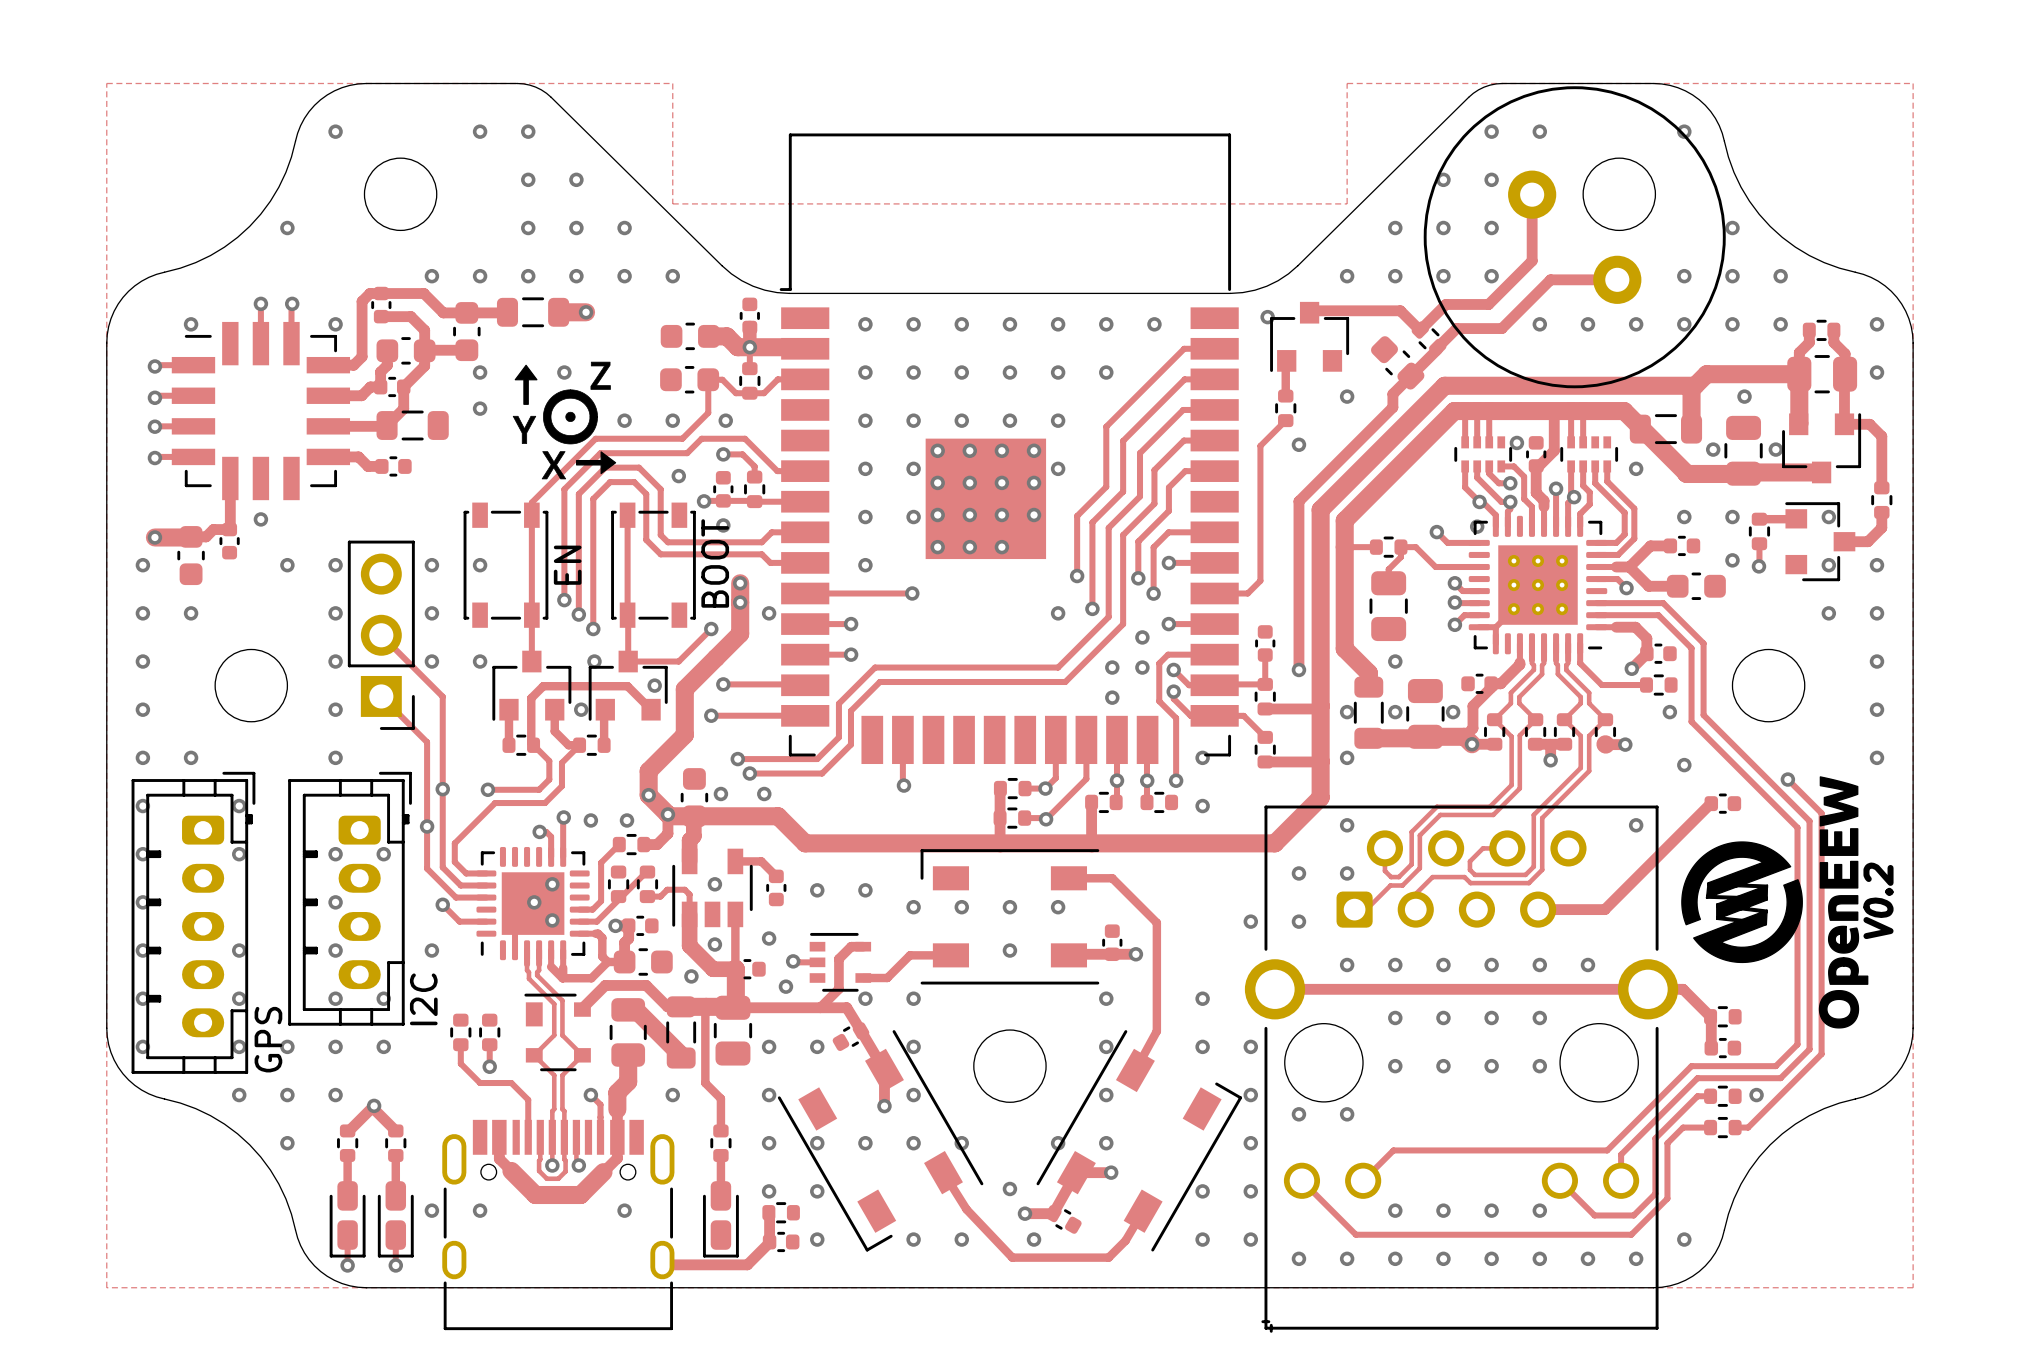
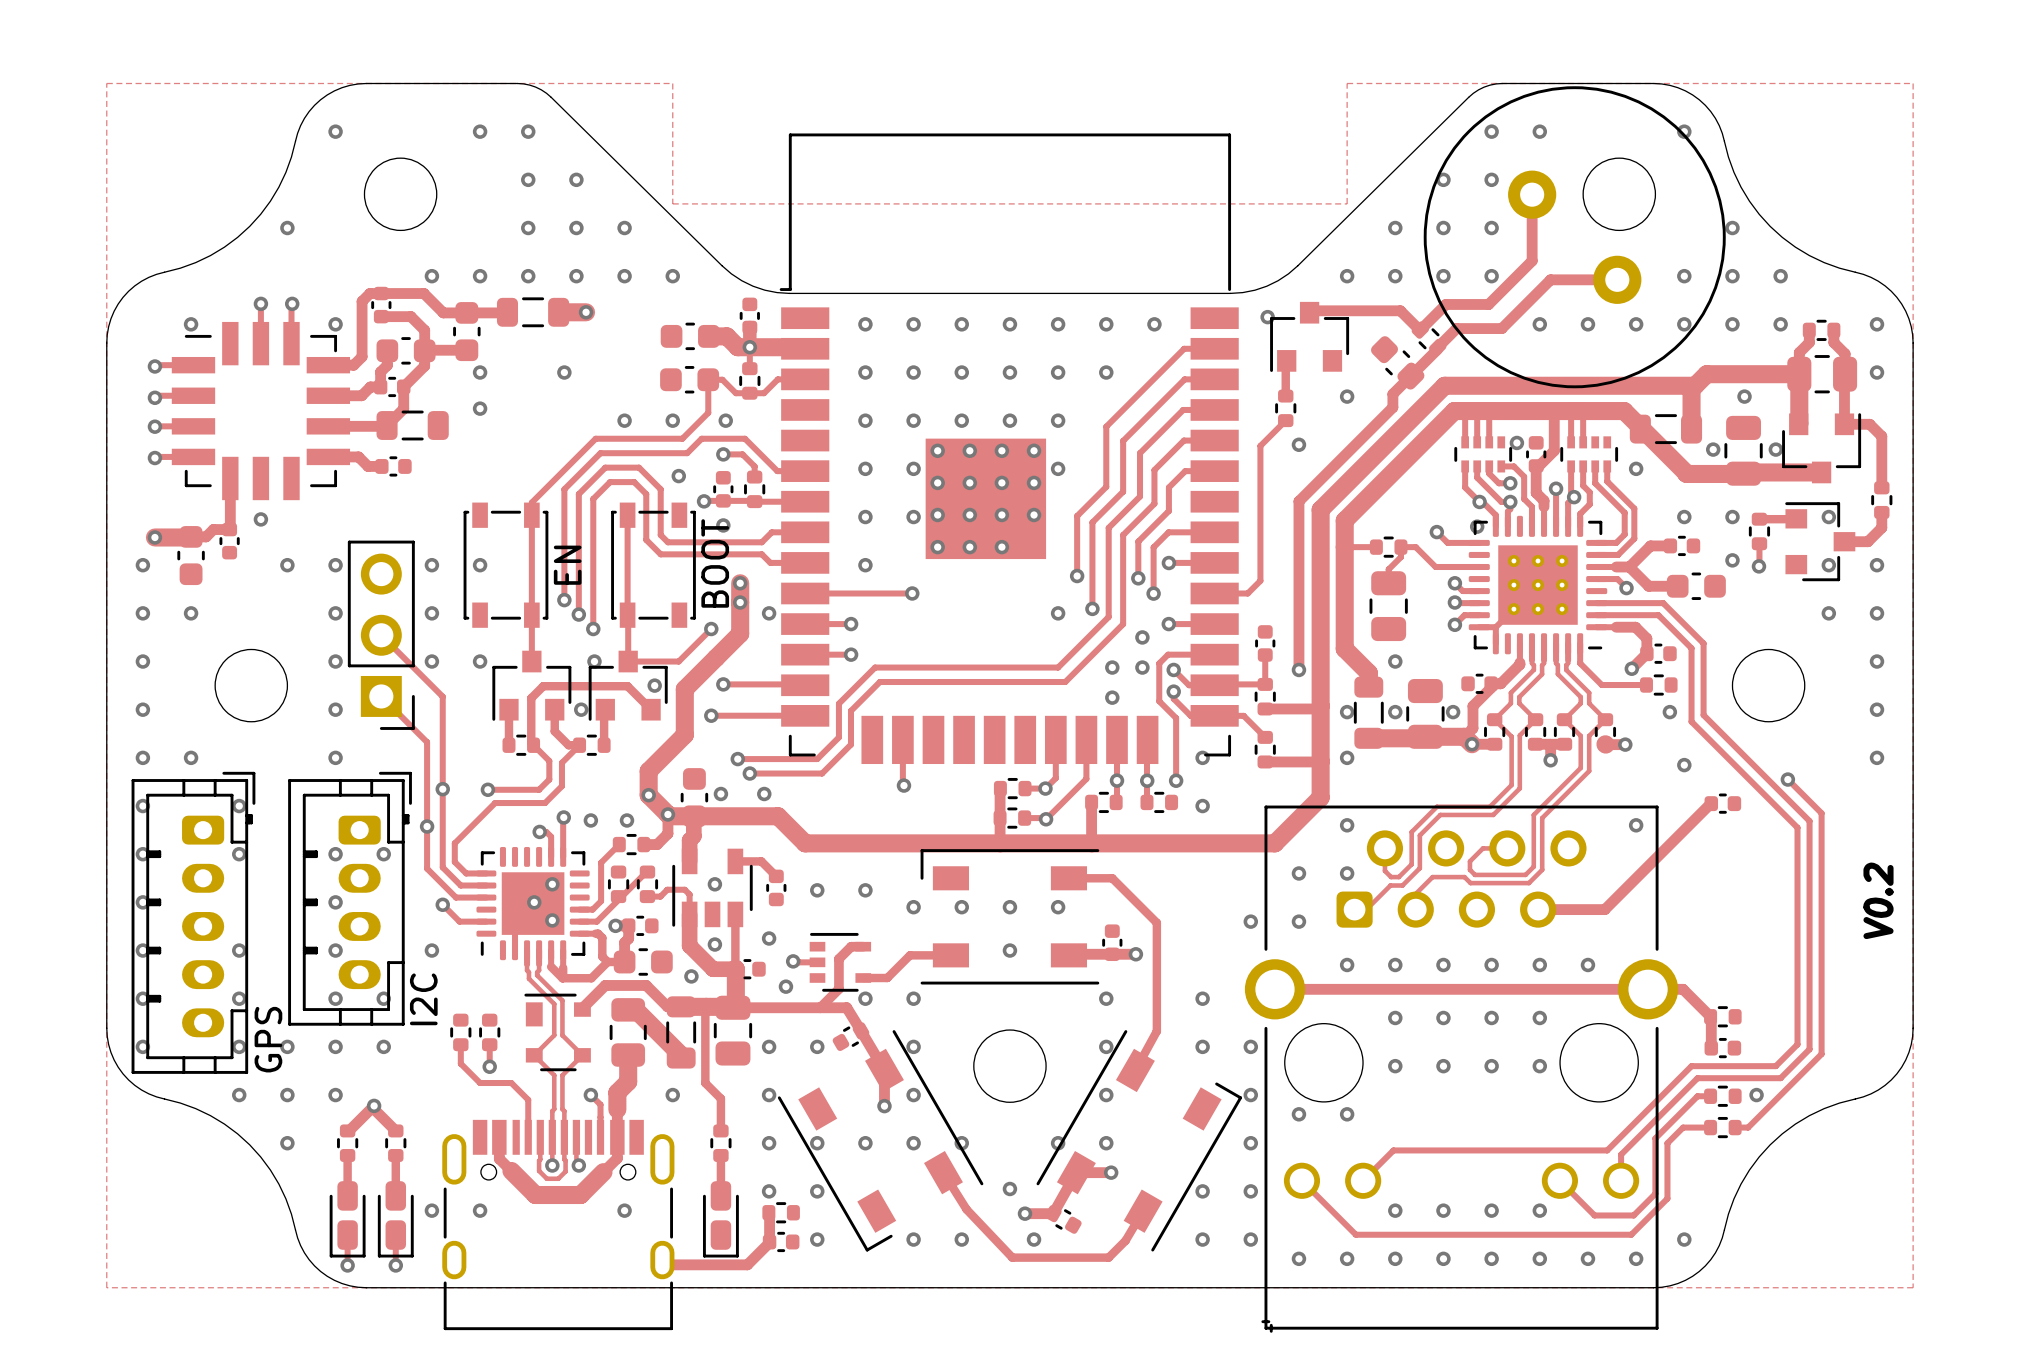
drawing: [512, 361, 617, 480] -> none
drawing: [1681, 776, 1869, 1029] -> none

